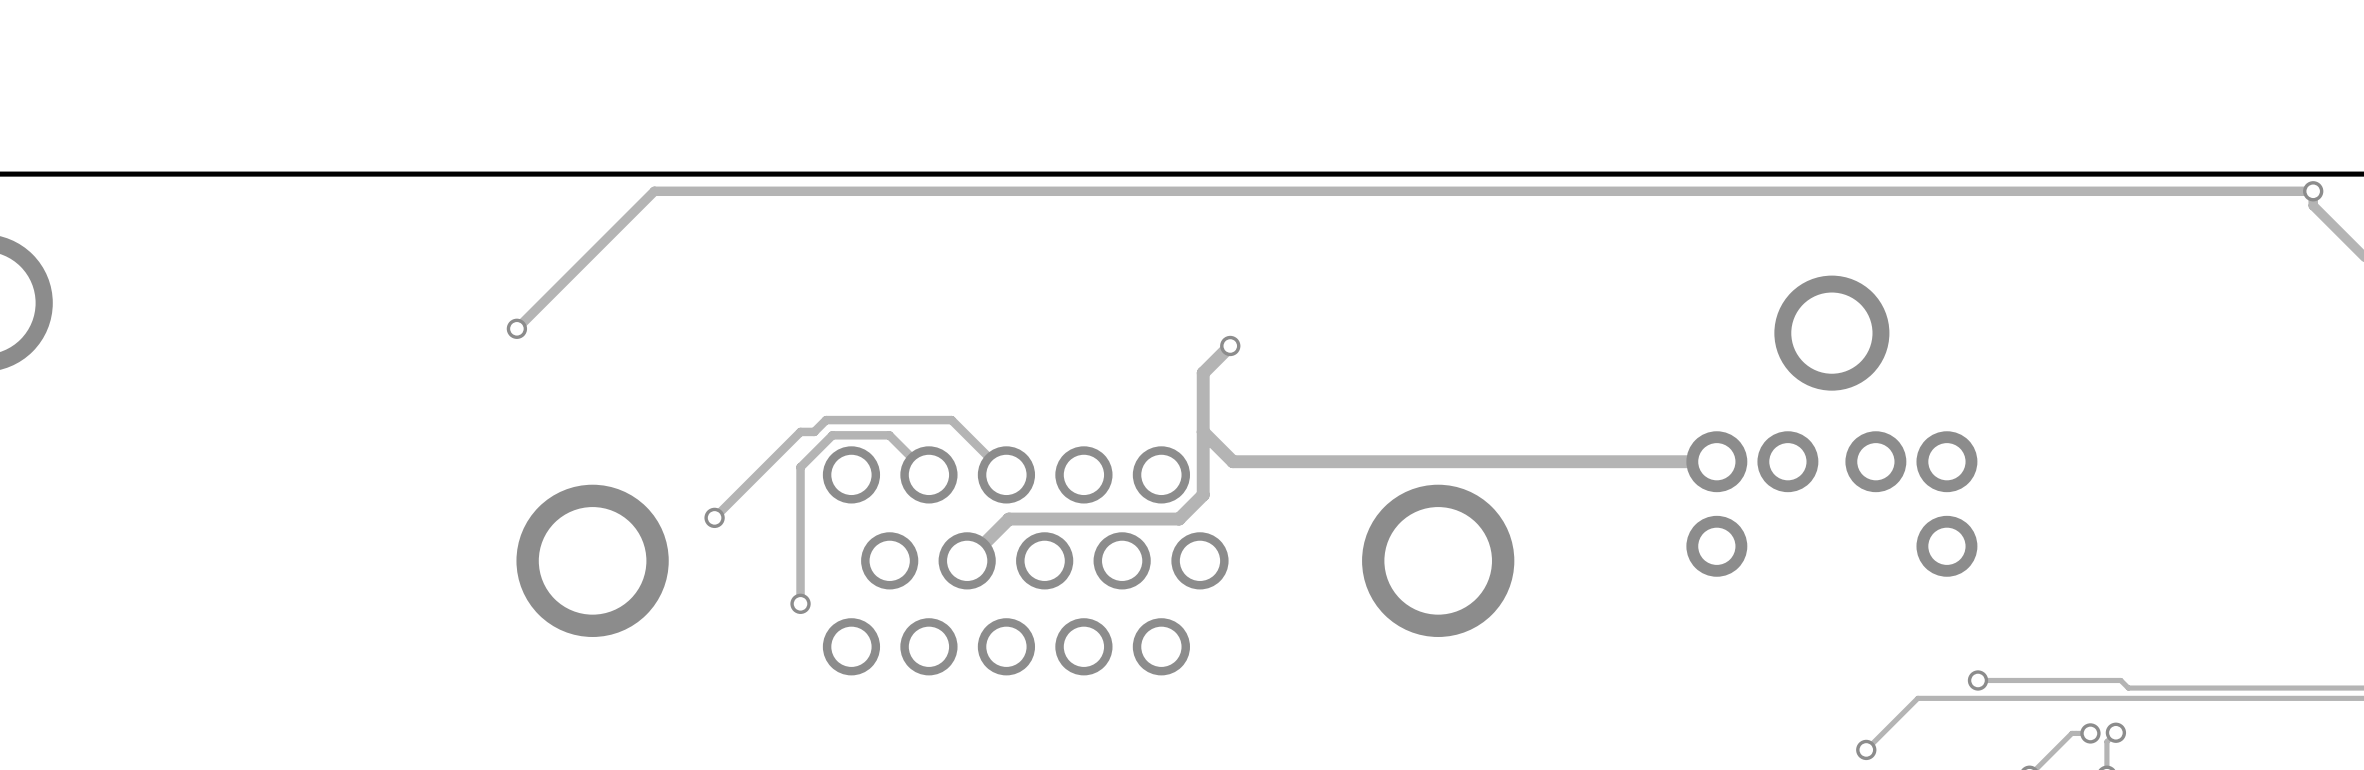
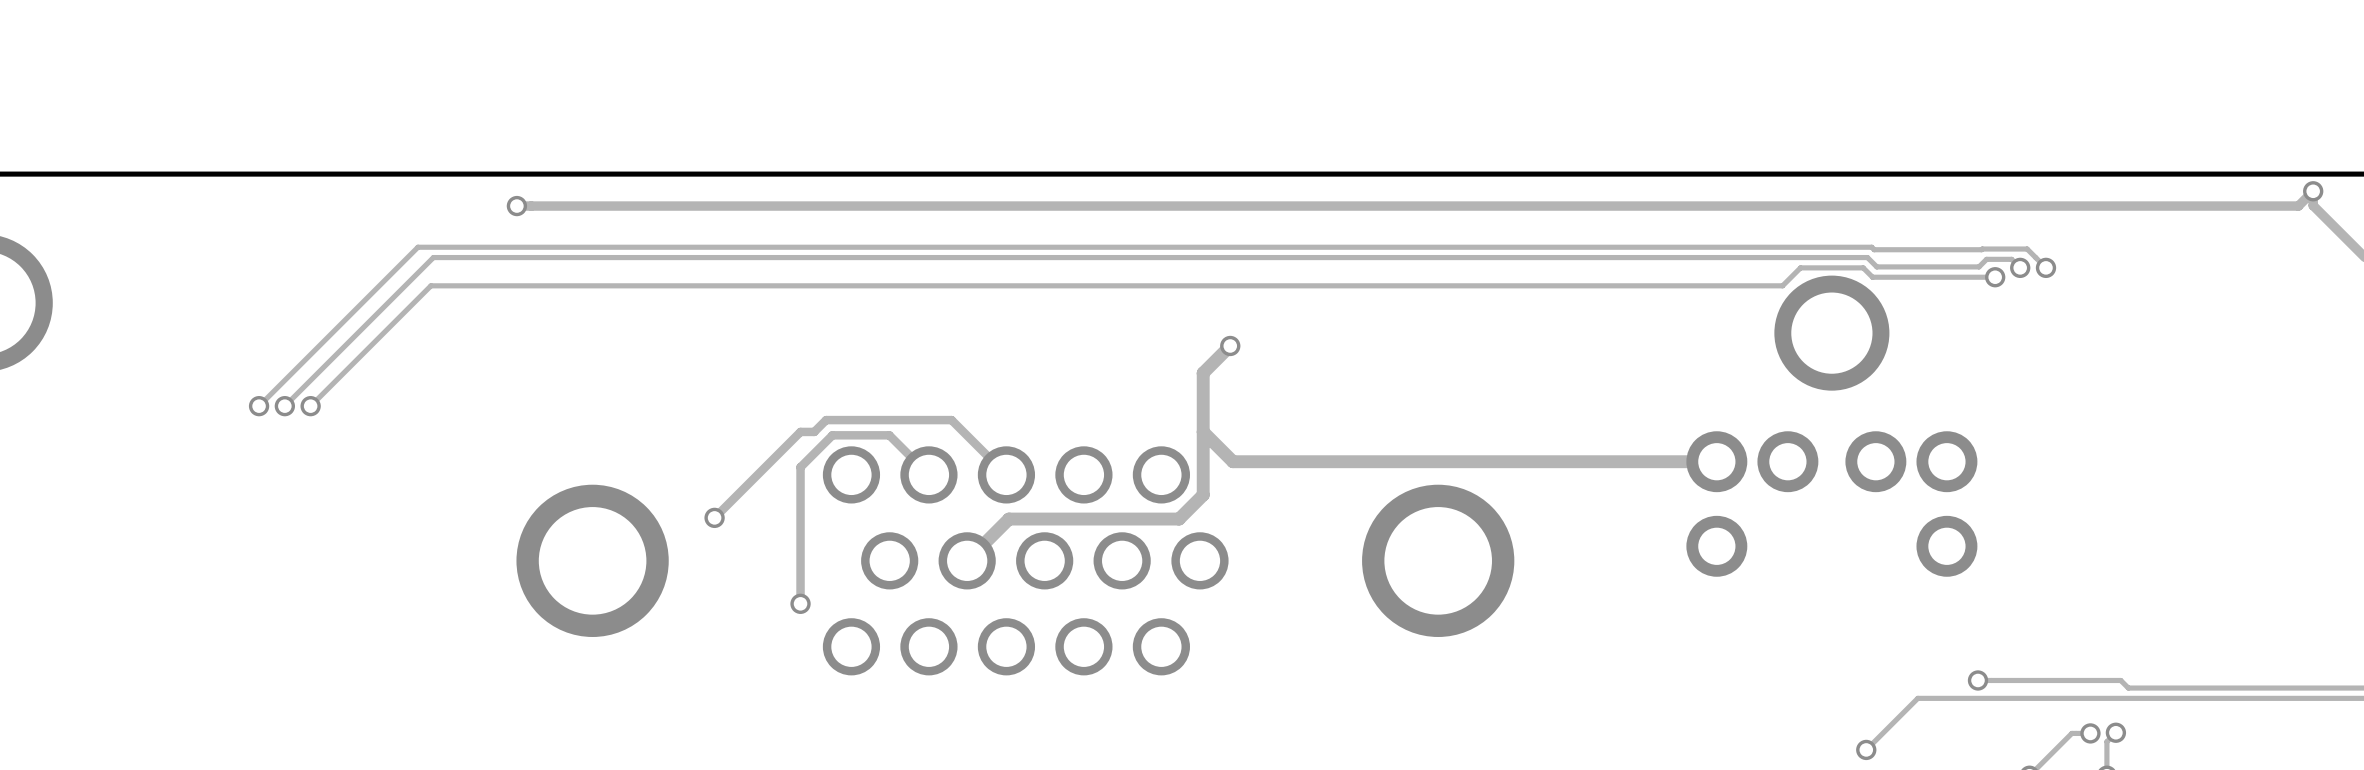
track: (2313, 191) (654, 191) (516, 328) -> (2313, 191) (2298, 206) (516, 206)
via: none -> (516, 206)
track: none -> (2020, 267) (2011, 259) (1986, 259) (1979, 266) (1876, 266) (1867, 257) (433, 257) (284, 406)
via: none -> (2020, 267)
track: none -> (2045, 267) (2027, 249) (1874, 249) (1871, 247) (417, 247) (259, 406)
via: none -> (2045, 267)
track: none -> (1995, 277) (1872, 277) (1863, 267) (1800, 267) (1782, 285) (430, 285) (310, 406)
via: none -> (1995, 277)
via: (516, 328) -> none
via: none -> (259, 406)
via: none -> (284, 406)
via: none -> (310, 406)

